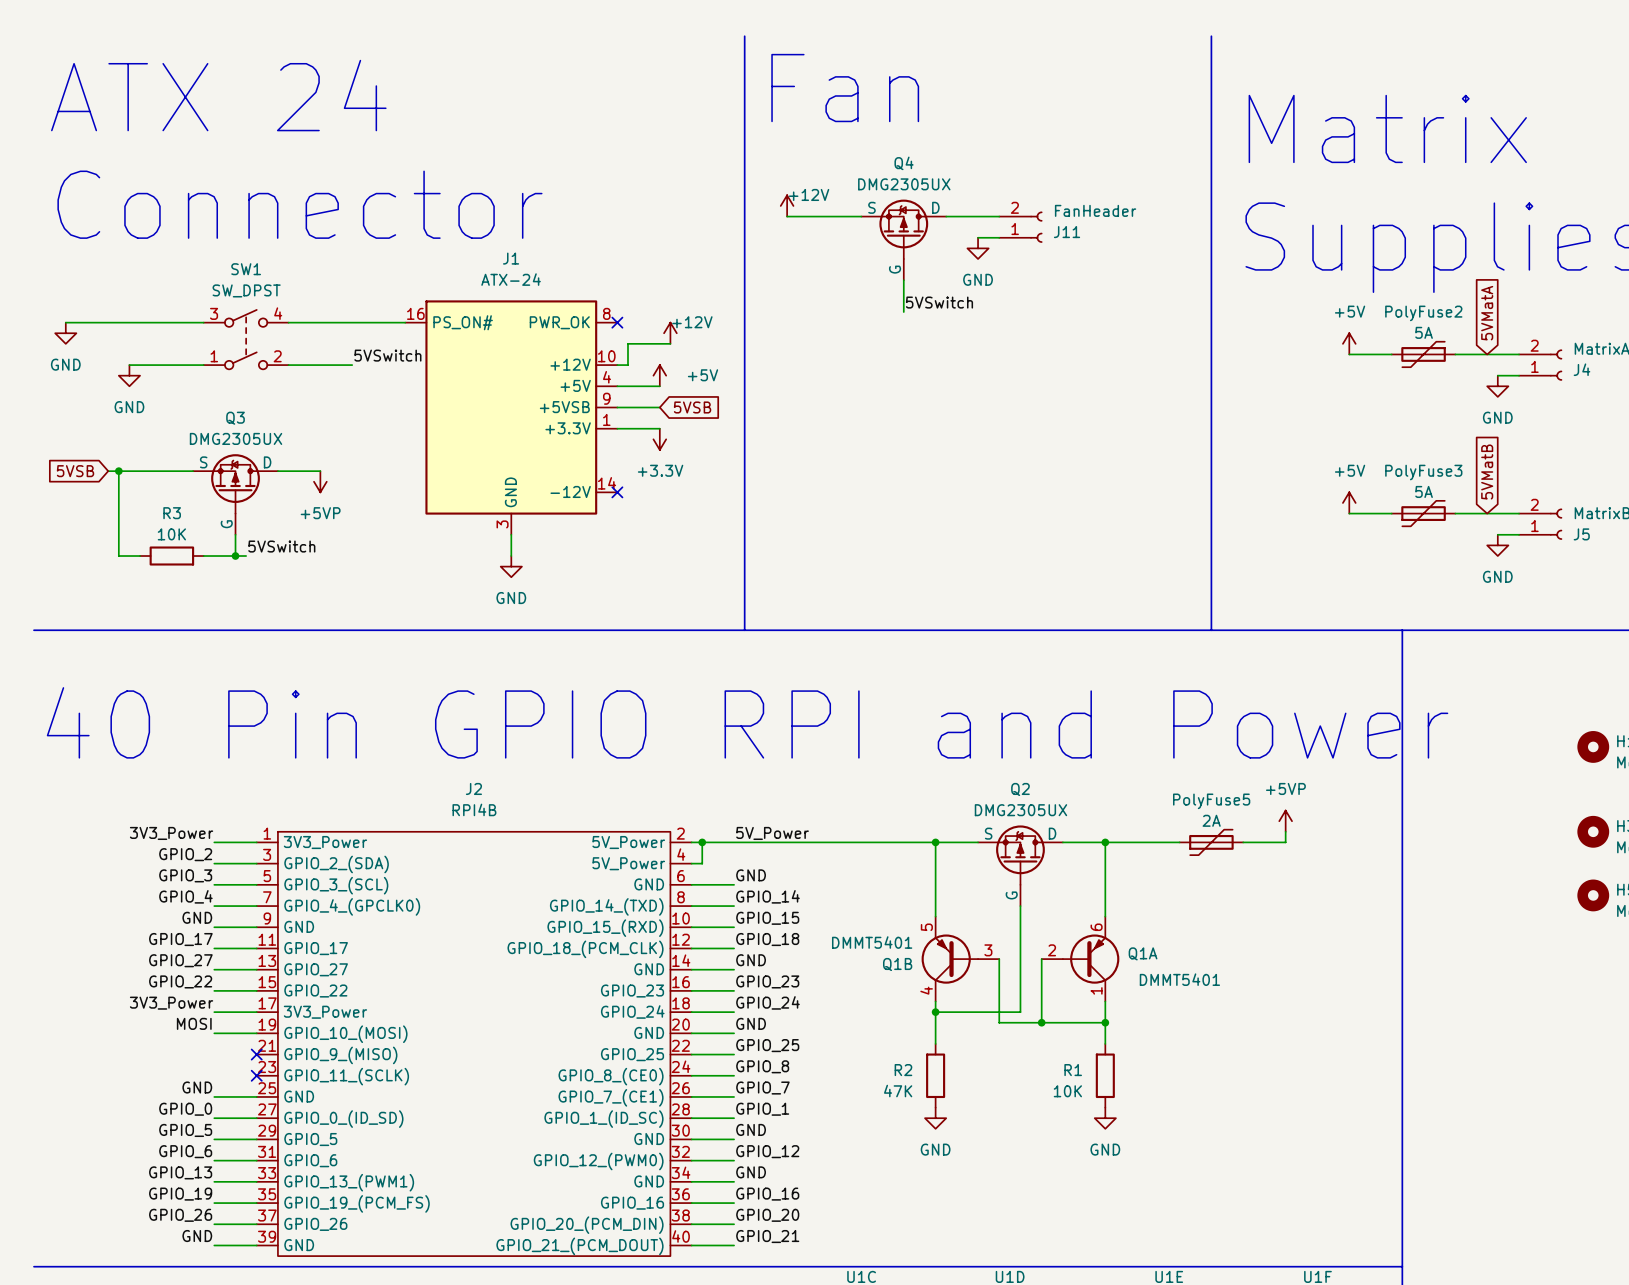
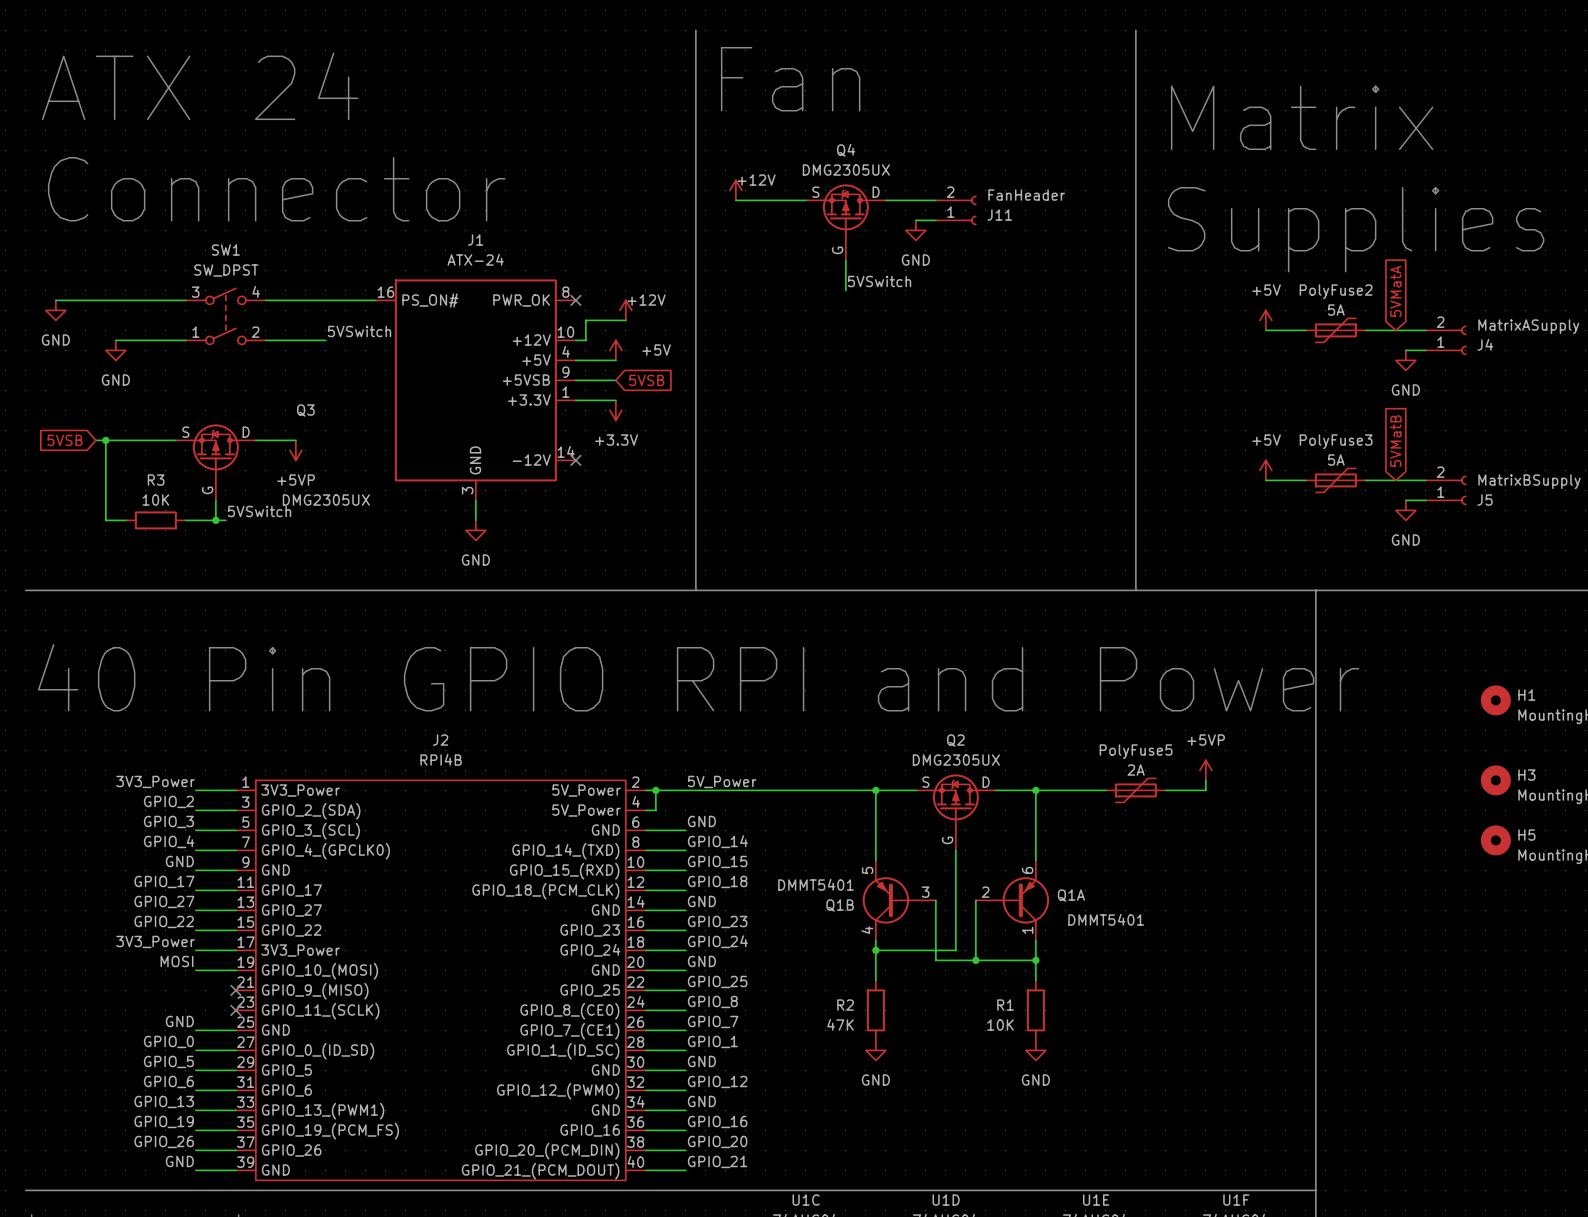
Q3 name position: Q3 (235, 418) -> Q3 (305, 410)
Q3 value position: DMG2305UX (236, 438) -> DMG2305UX (326, 500)

